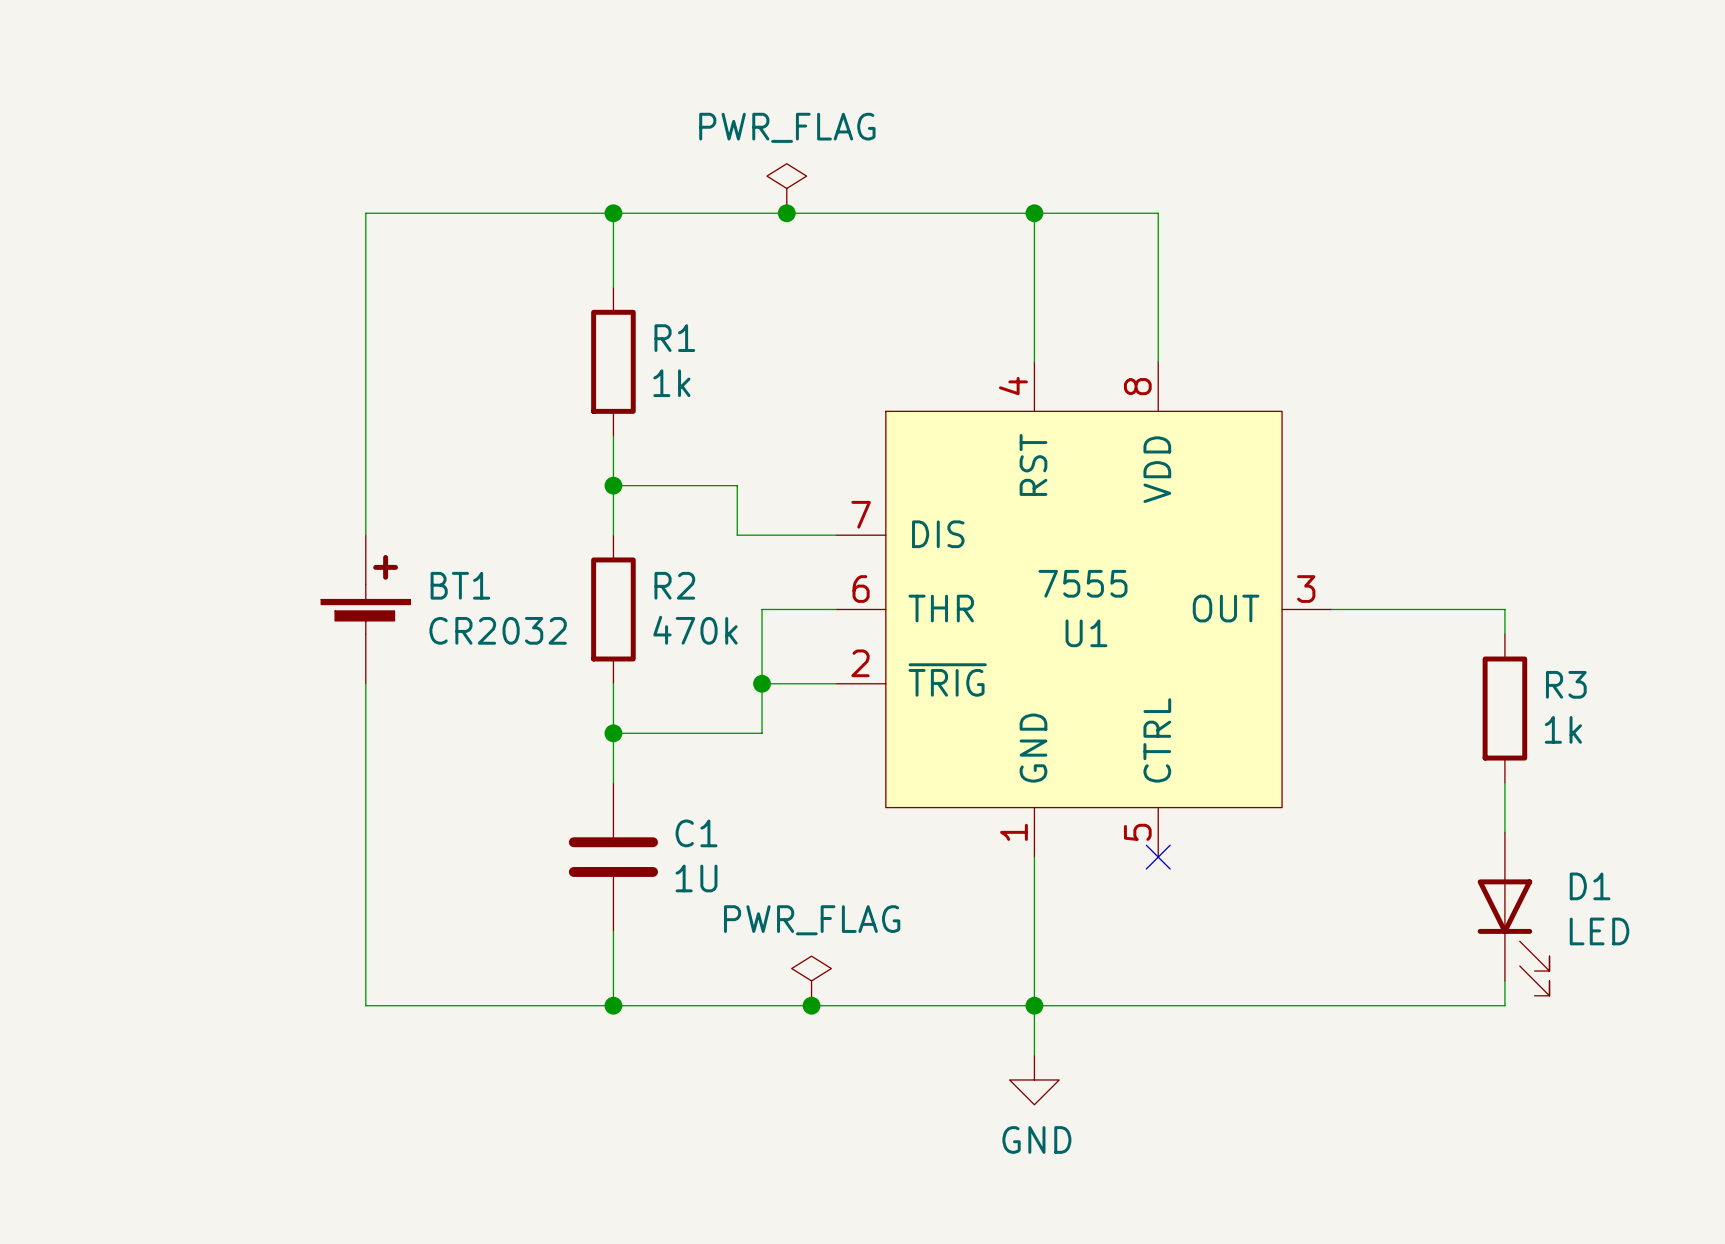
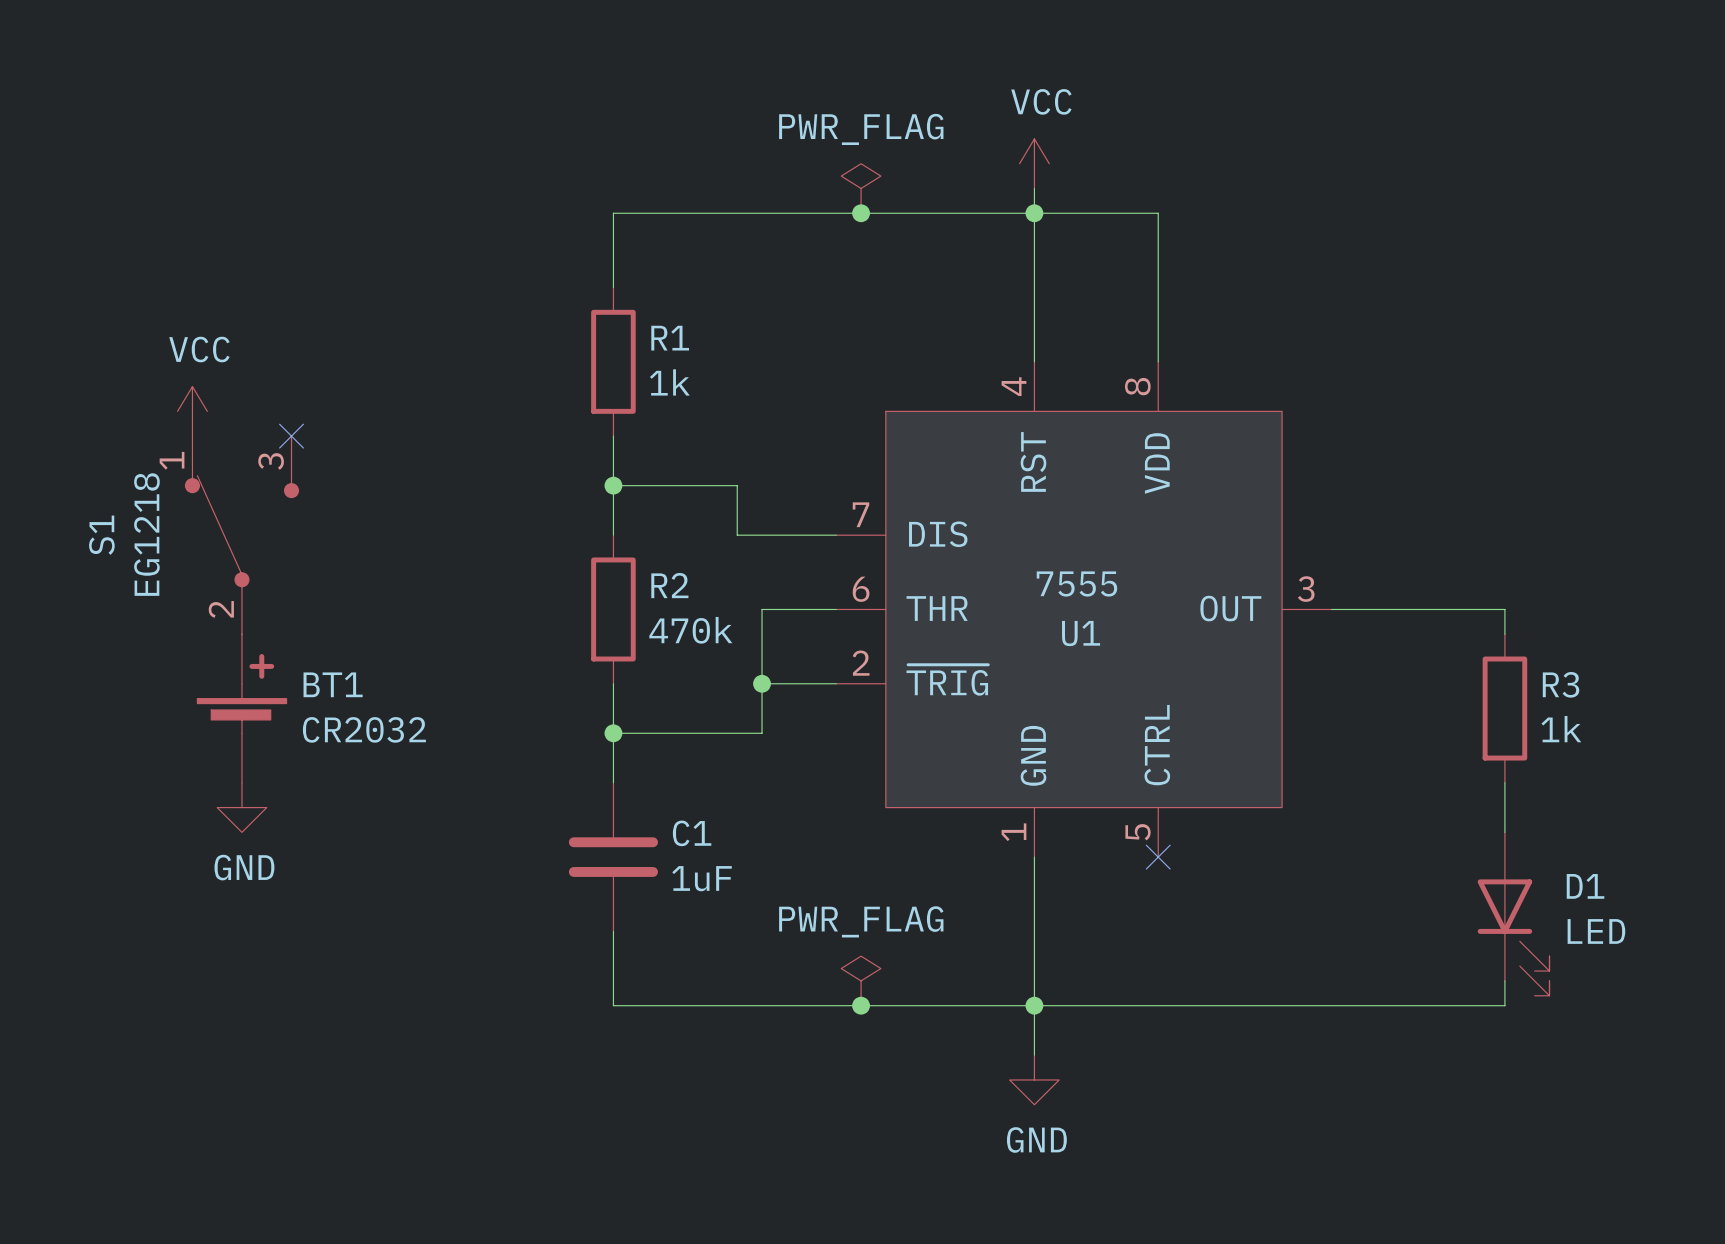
power symbol: none -> VCC (1034, 163)
power symbol position: PWR_FLAG (786, 188) -> PWR_FLAG (861, 188)
wire: none -> (1034, 188) (1034, 213)
wire: (613, 213) (365, 213) (365, 535) -> none
junction: (613, 213) -> none
junction position: (786, 213) -> (861, 213)
power symbol: none -> VCC (192, 411)
no-connect mark: none -> (291, 436)
S1: none -> EG1218 (241, 535)
BT1 position: (365, 609) -> (241, 708)
wire: (365, 683) (365, 1005) (613, 1005) -> none
power symbol: none -> GND (241, 807)
C1 value: 1U (696, 878) -> 1uF (702, 878)
power symbol position: PWR_FLAG (811, 980) -> PWR_FLAG (861, 980)
junction: (613, 1005) -> none
junction position: (811, 1005) -> (861, 1005)

